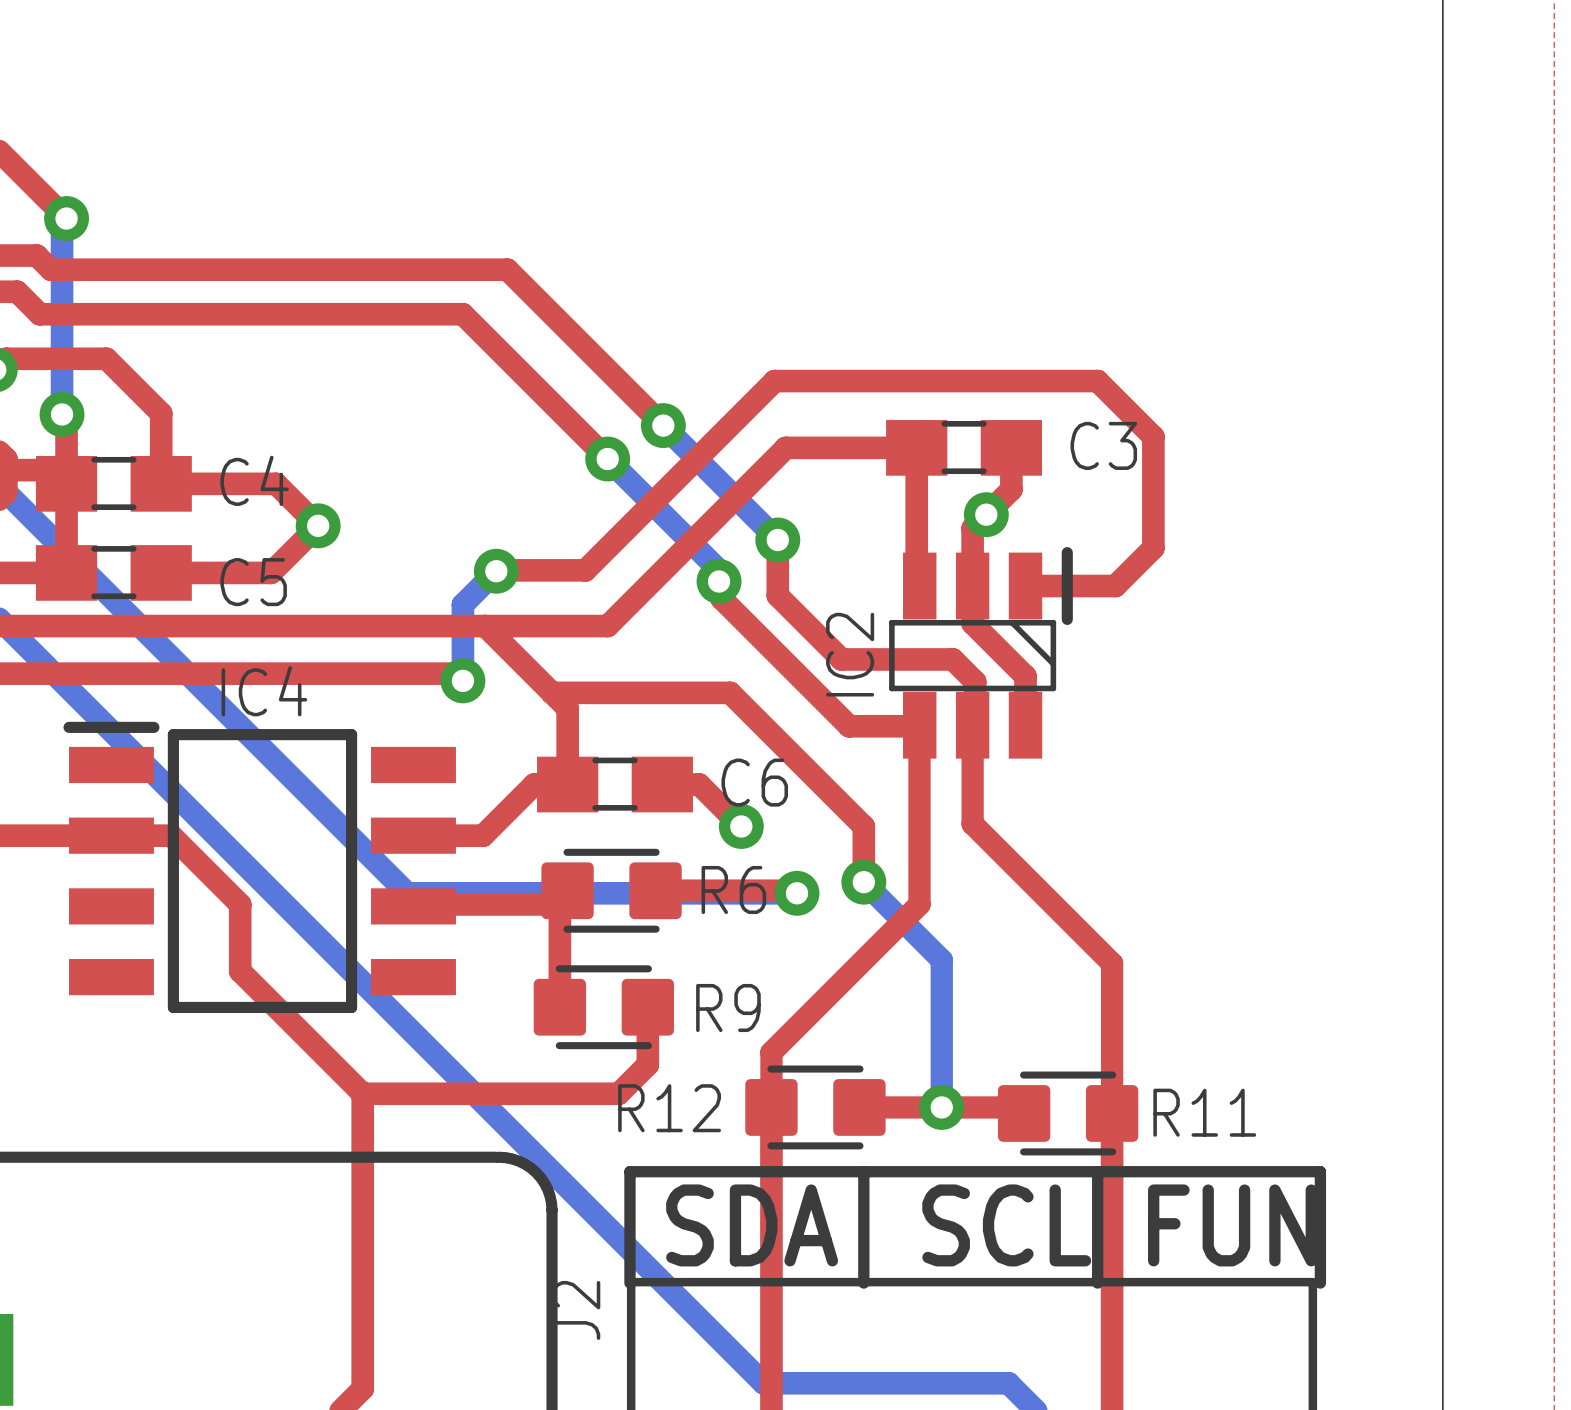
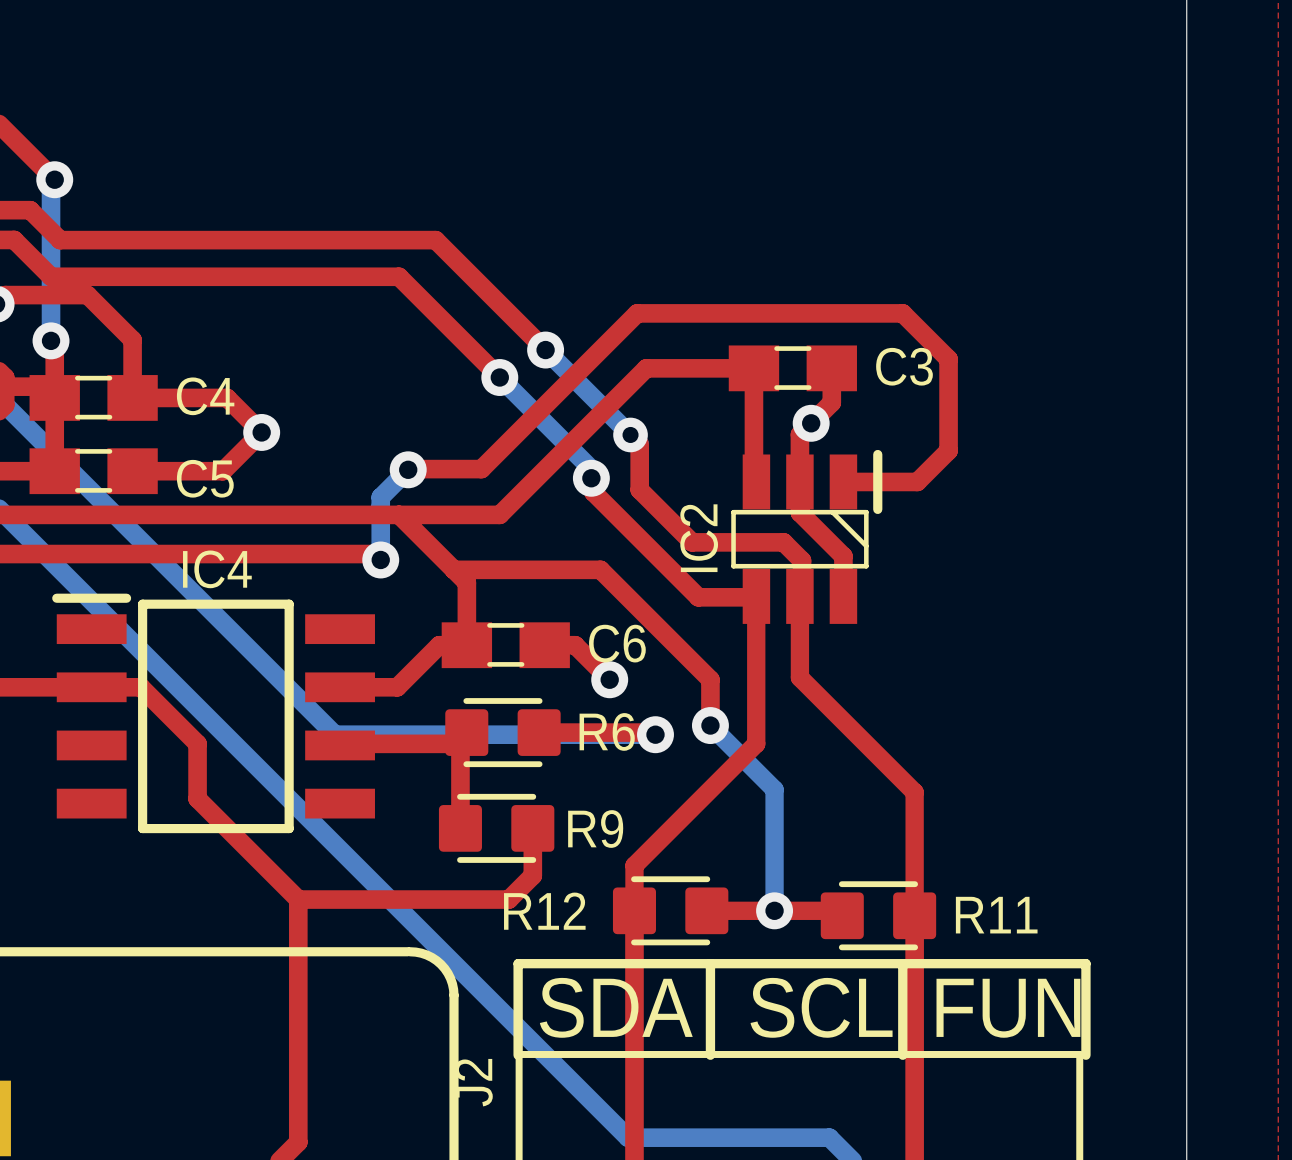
top track: (50, 269) (507, 269) (529, 291) -> (41, 221) (60, 240) (435, 240)
top track: (39, 314) (462, 314) (485, 336) -> (32, 258) (51, 276) (399, 276)
via position: (777, 540) -> (630, 434)

